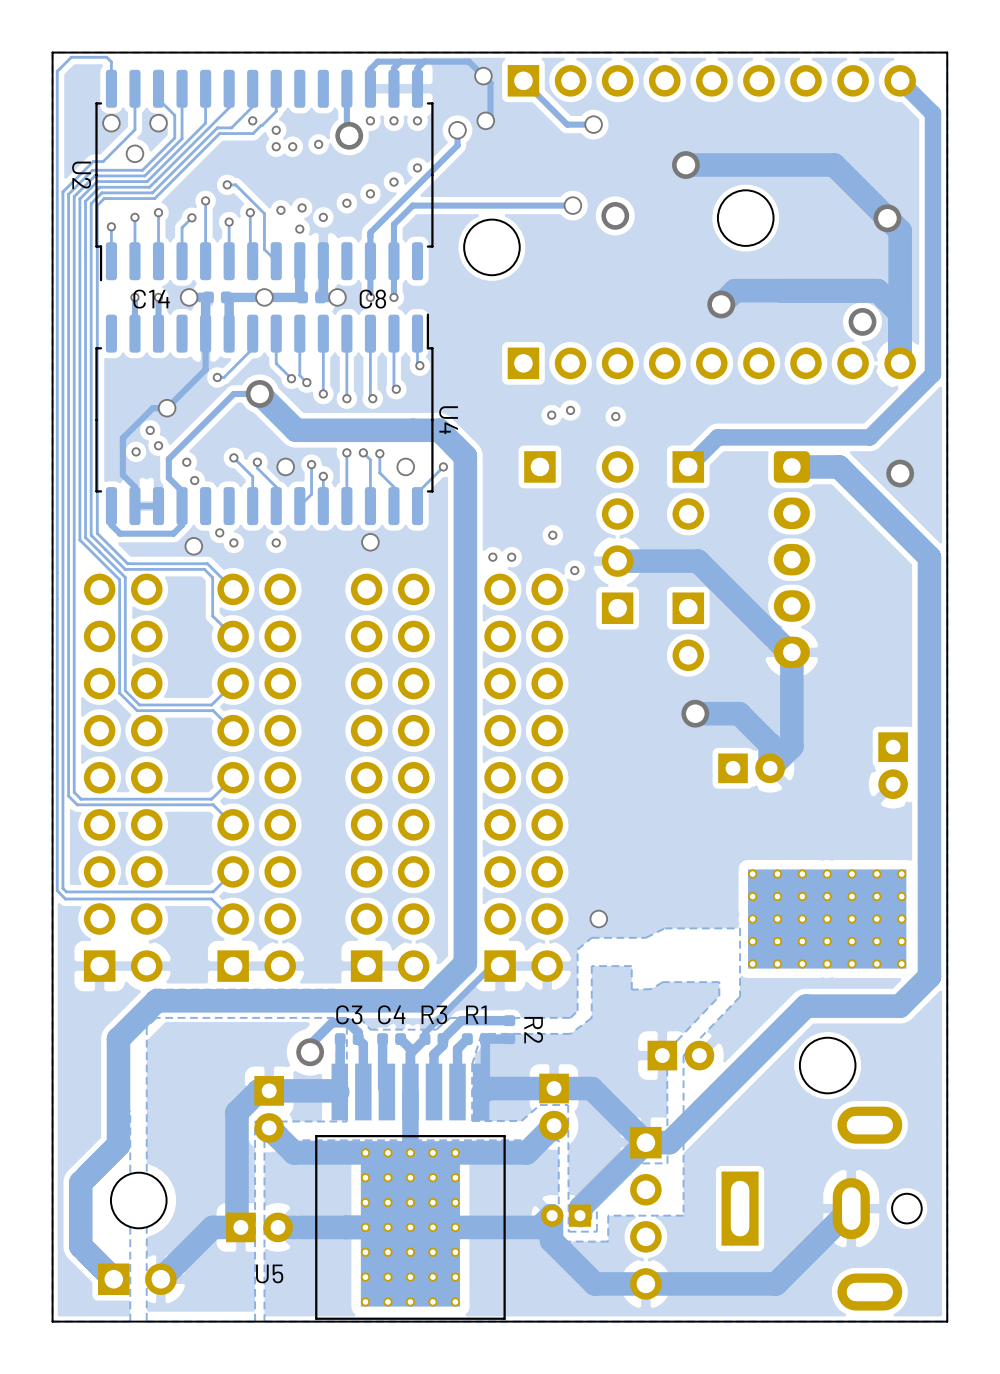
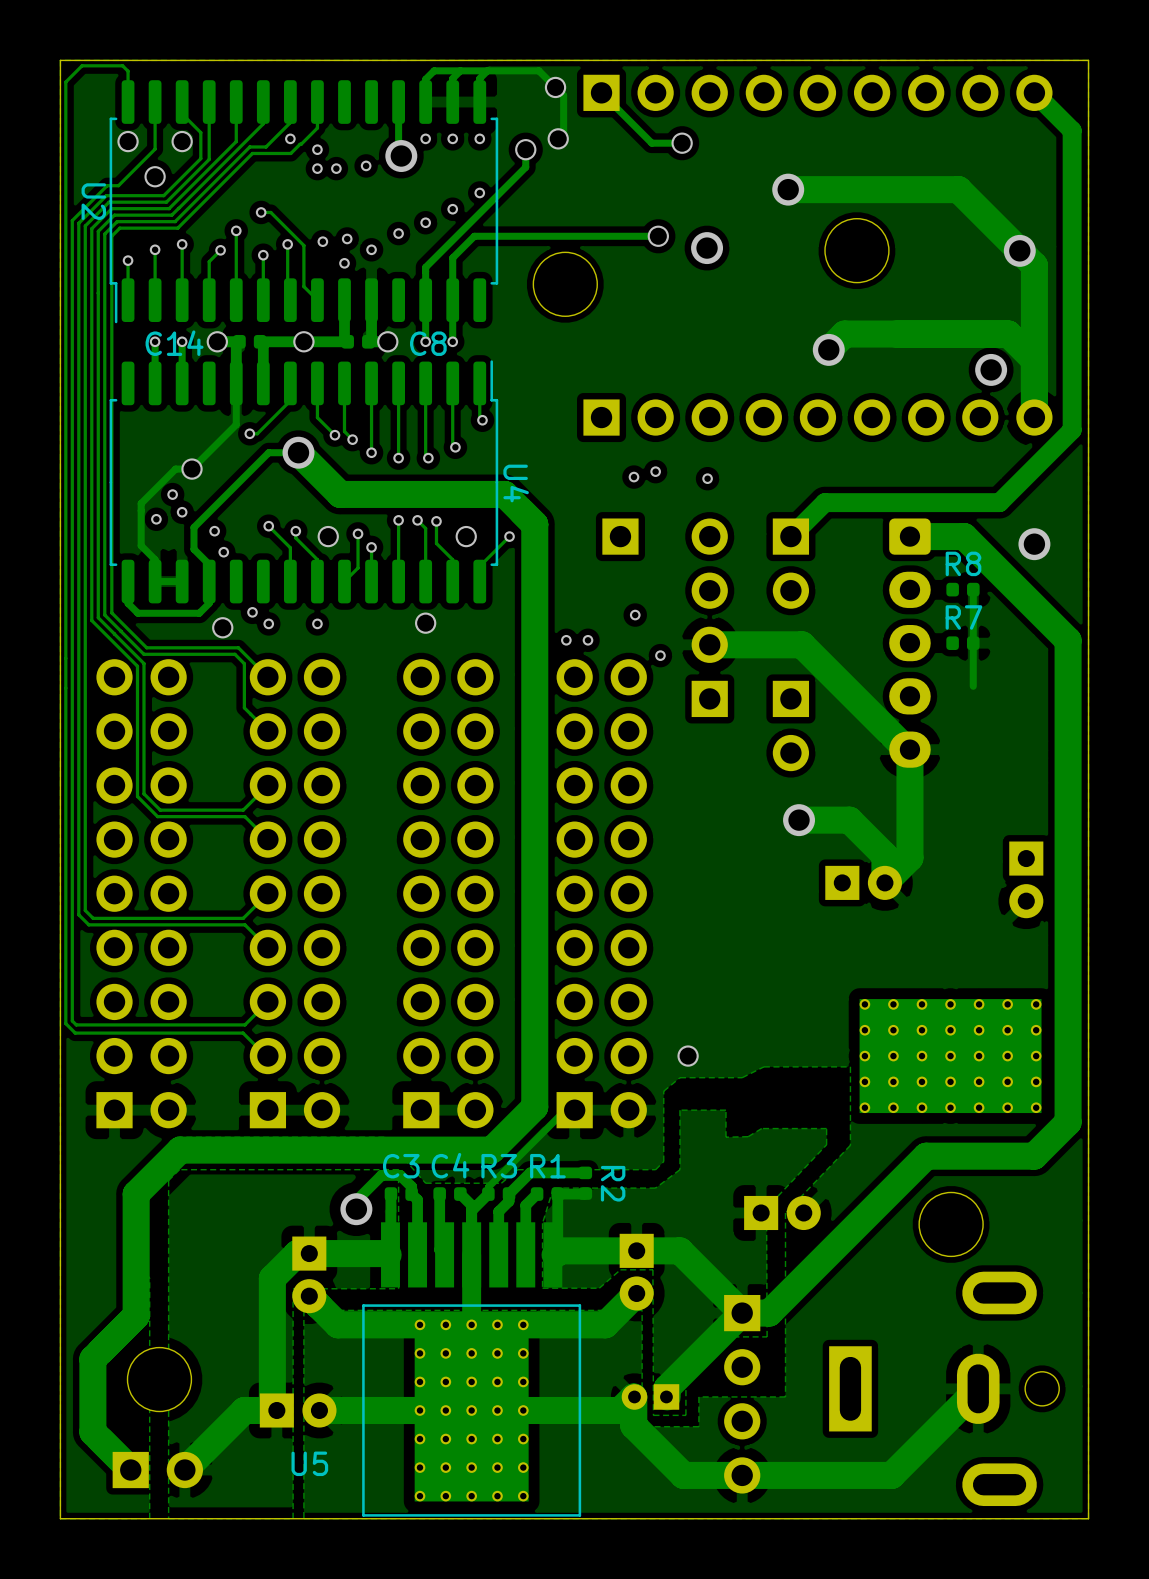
R8: none -> (962, 589)
track: none -> (973, 589) (973, 686)
R7: none -> (962, 643)

